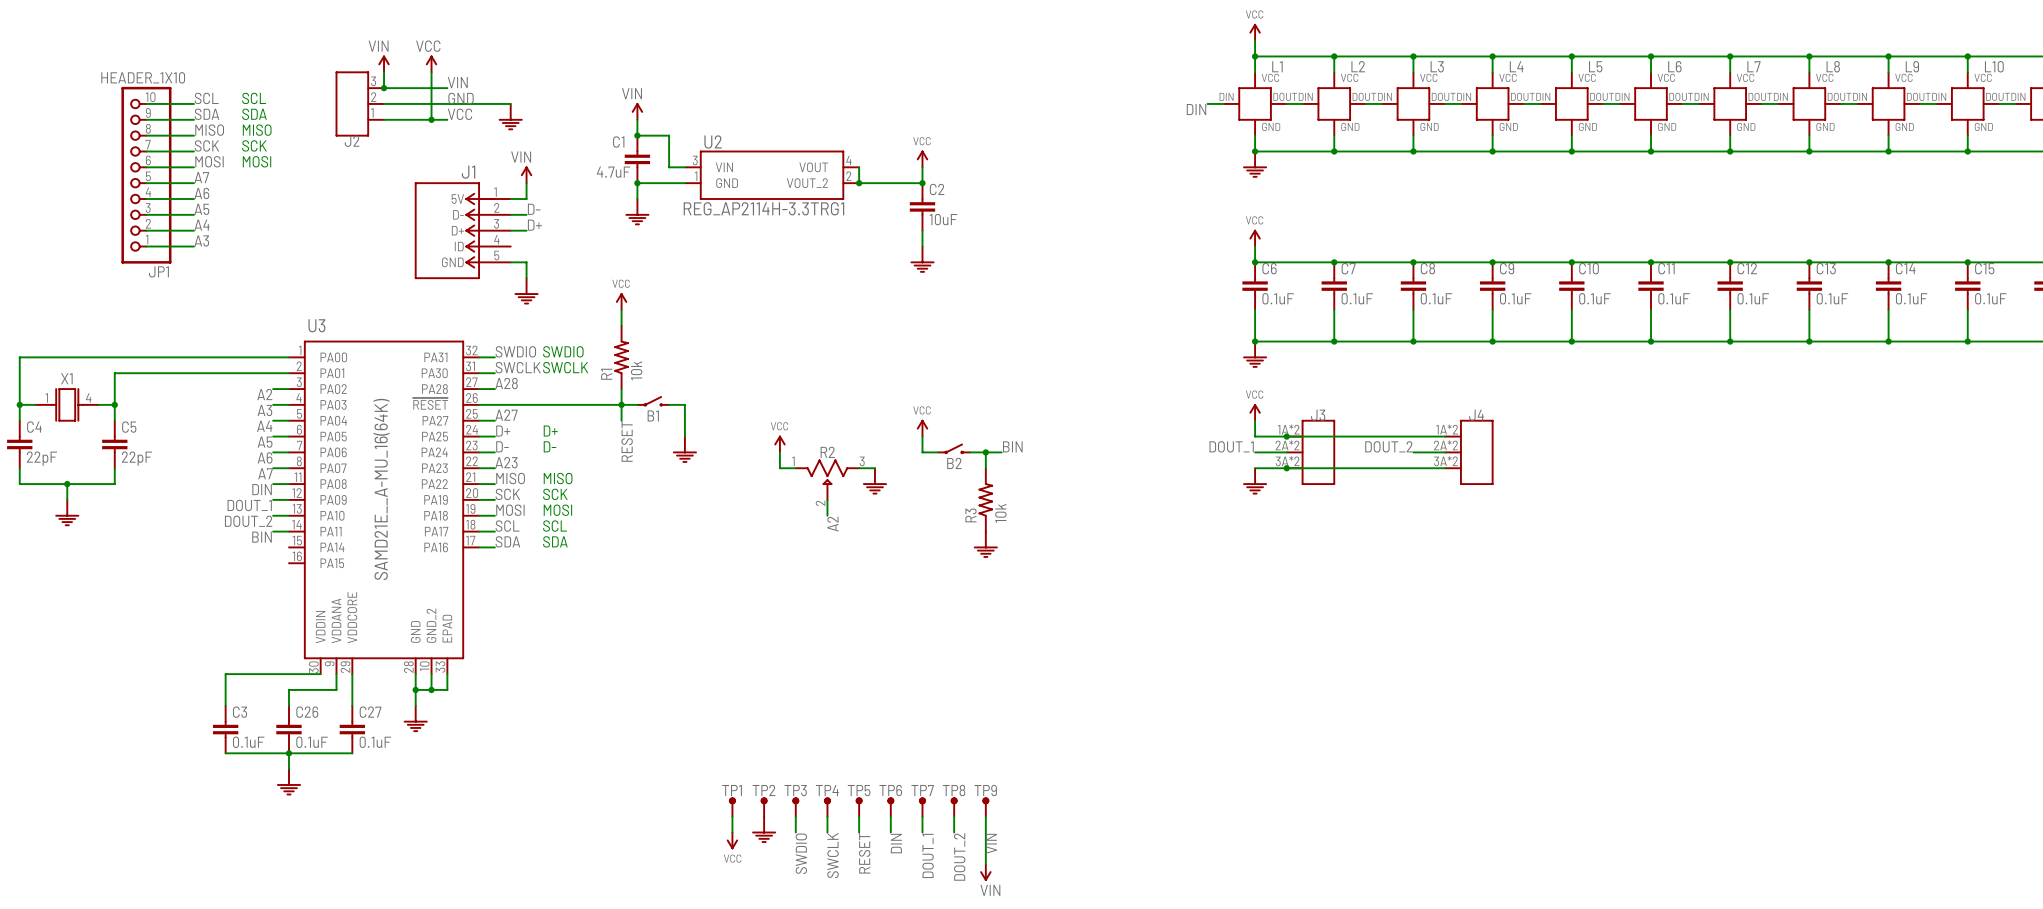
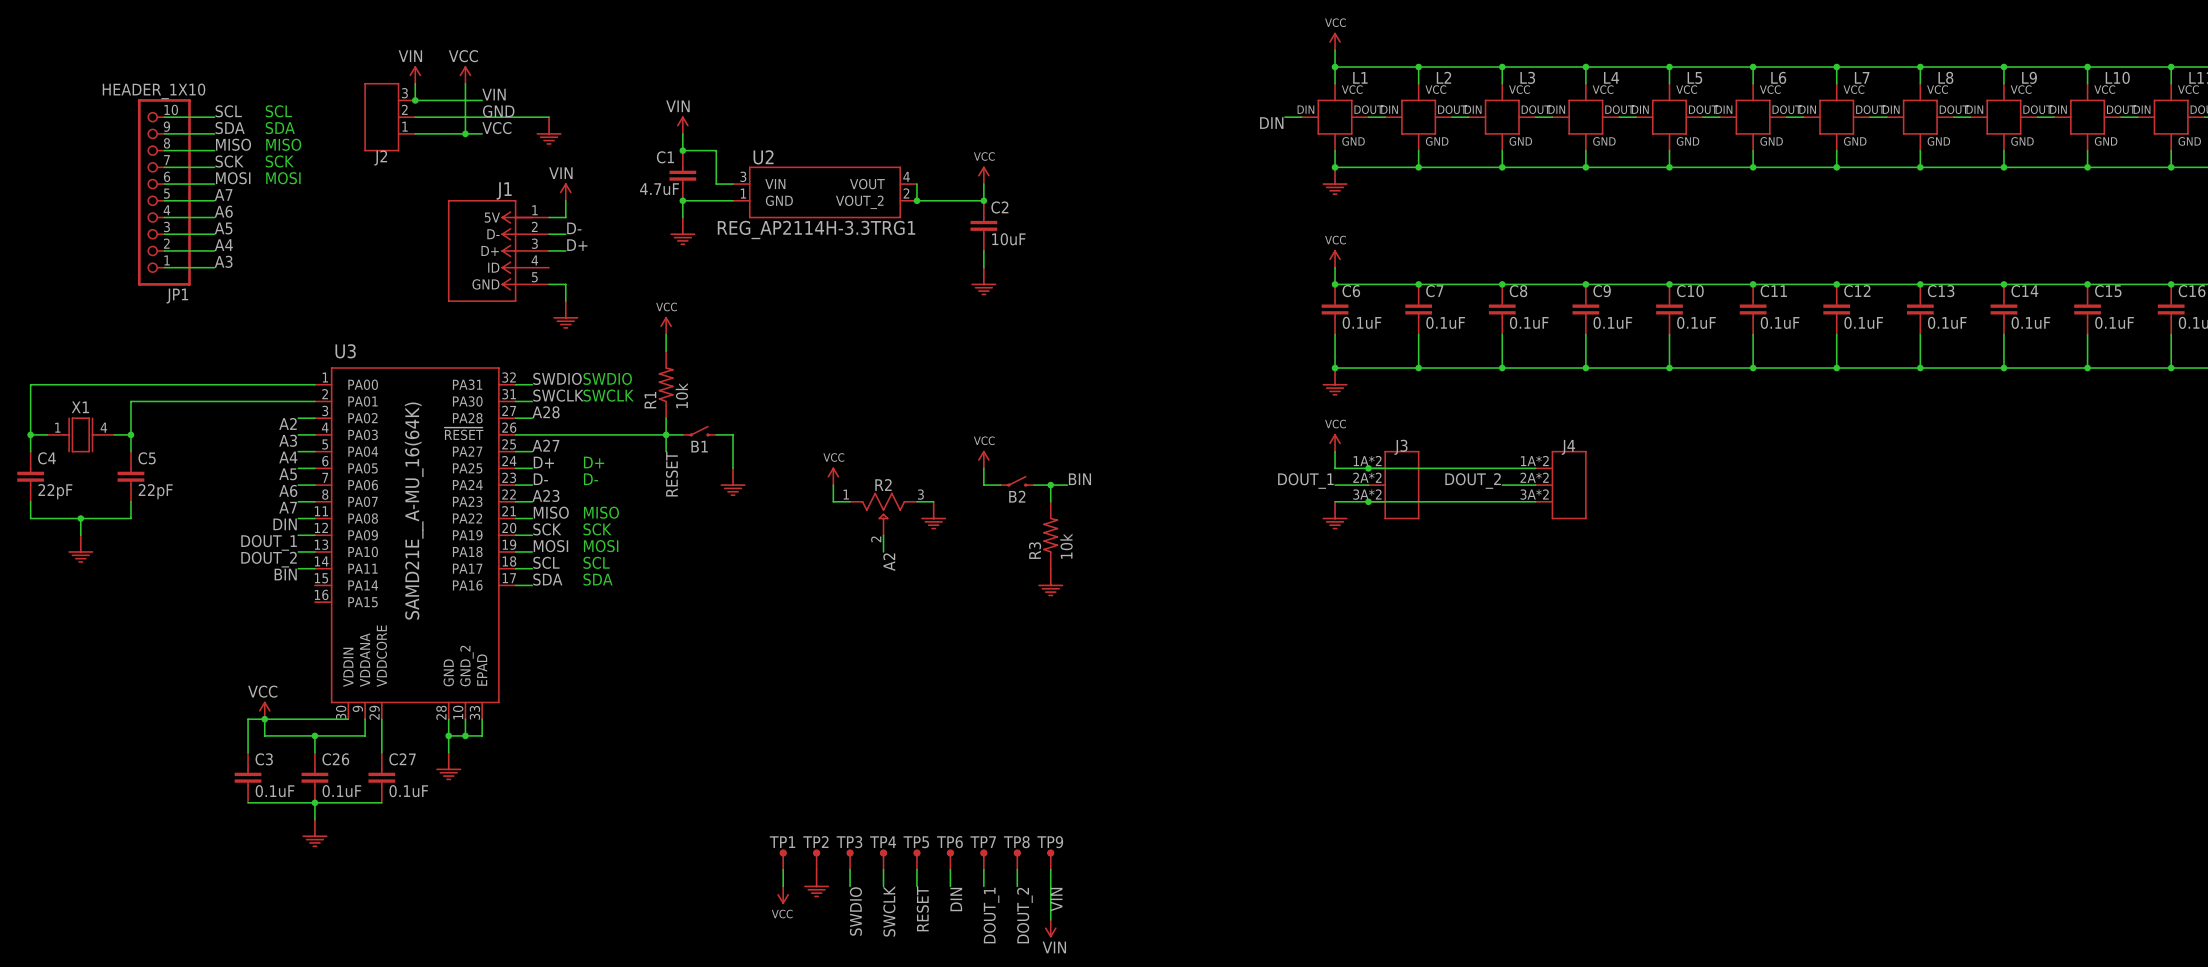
power symbol: none -> VCC (264, 710)
wire: none -> (264, 719) (264, 735) (314, 735)
junction: none -> (264, 719)
junction: none -> (314, 735)

